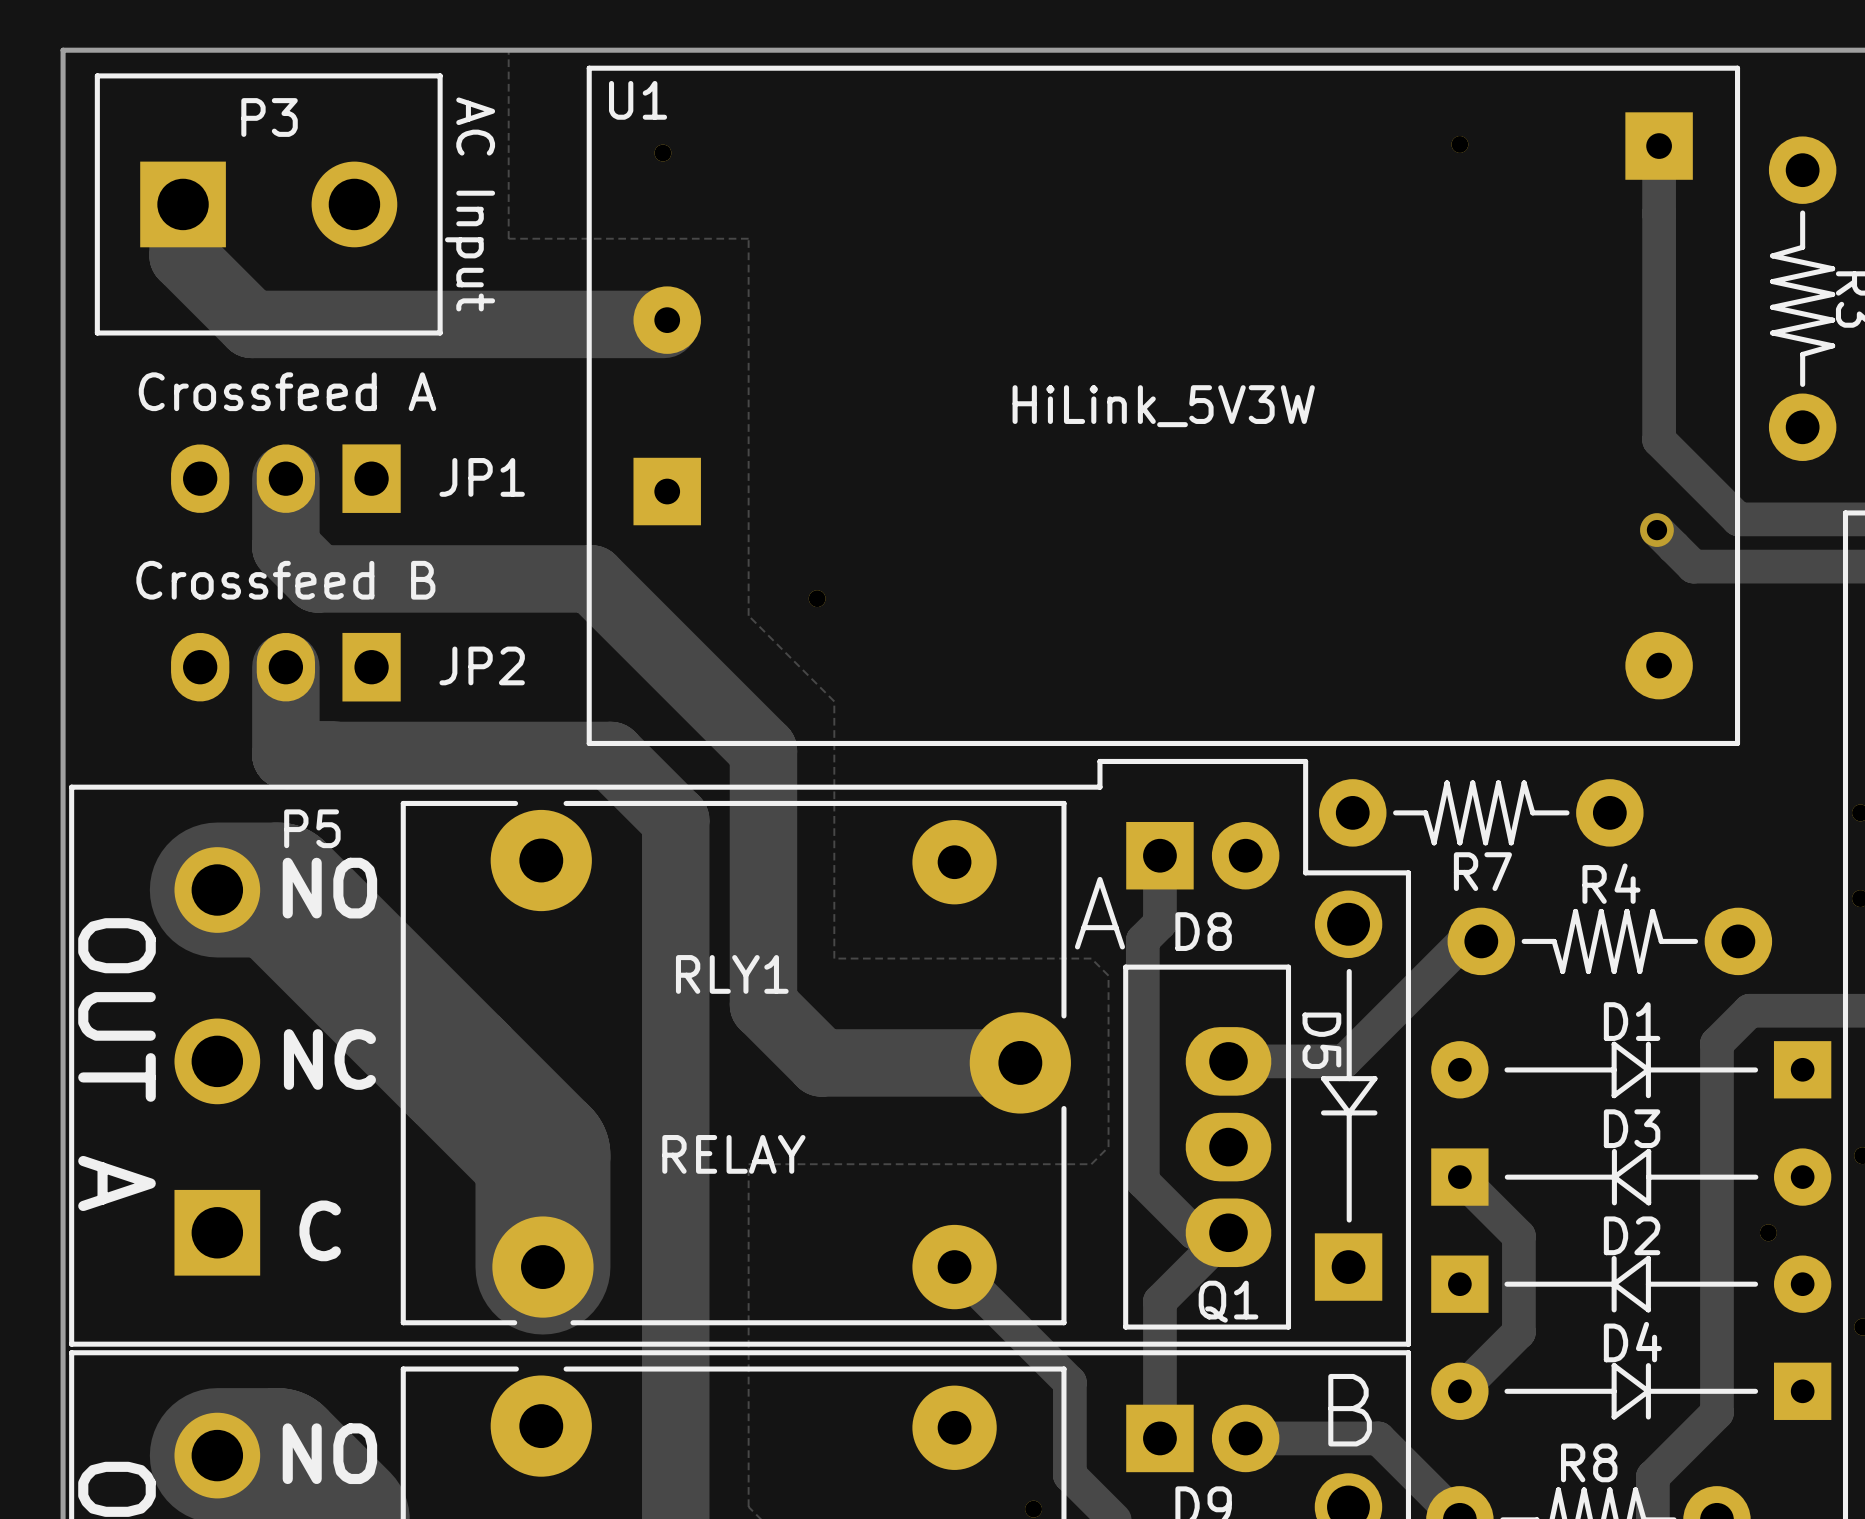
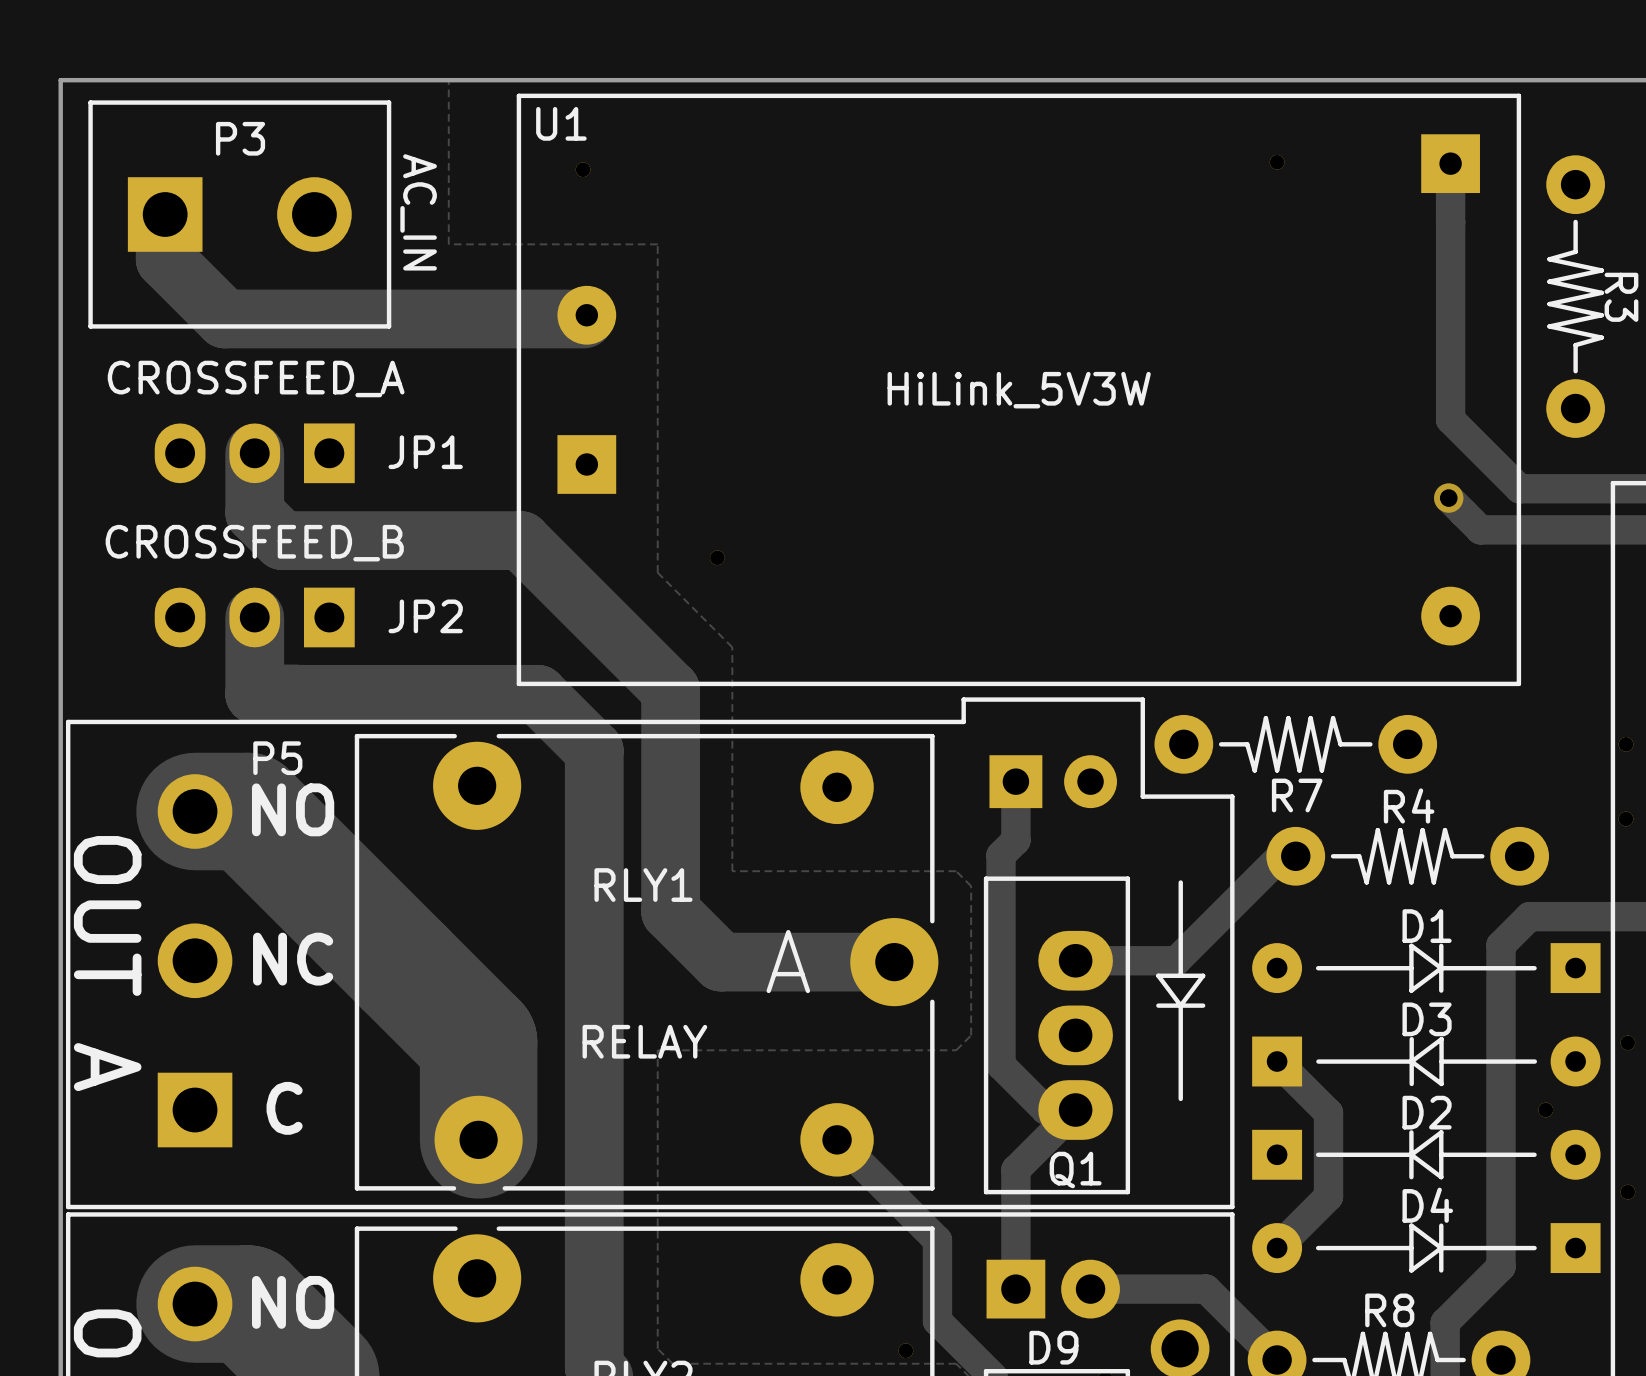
P3 value: AC Input (470, 204) -> AC_IN (418, 212)
JP1 value: Crossfeed A (287, 391) -> CROSSFEED_A (256, 378)
JP2 value: Crossfeed B (285, 580) -> CROSSFEED_B (254, 543)
D8: (1202, 855) -> none
part: none -> (1053, 781)
text position: A (1099, 913) -> A (788, 961)
D5: (1348, 1095) -> none
text: B (1350, 1410) -> none

